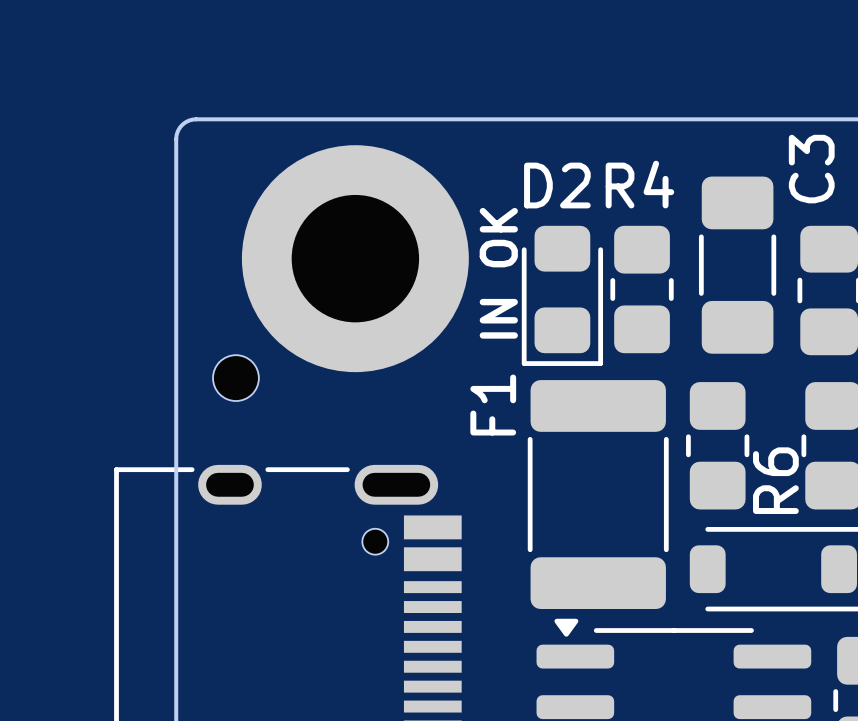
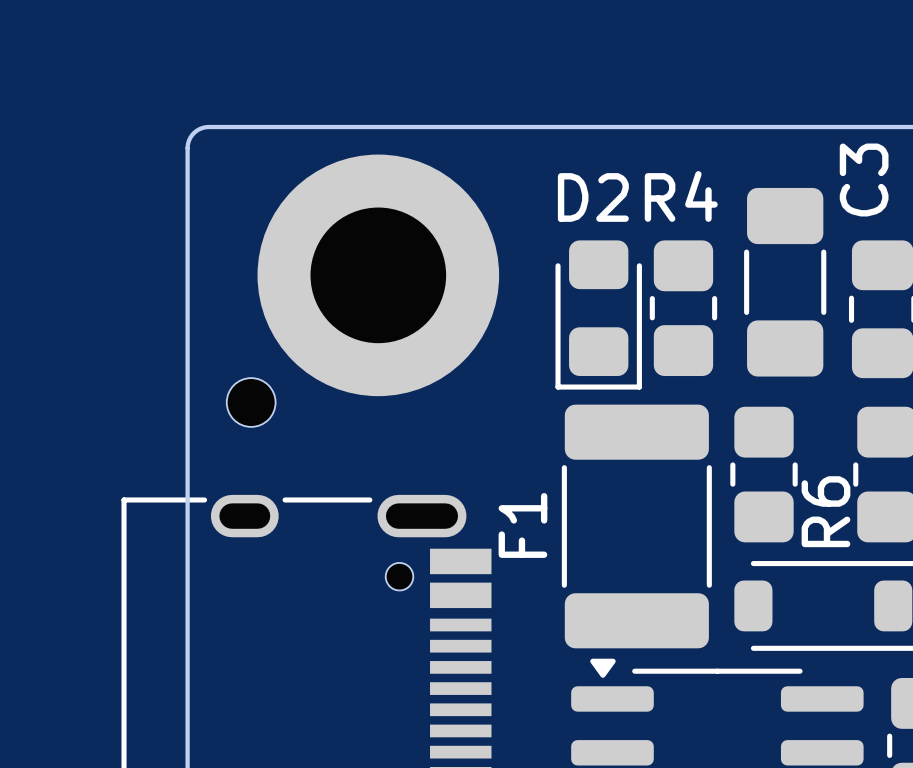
text: IN OK (498, 273) -> none
F1 name position: F1 (493, 405) -> F1 (522, 525)

